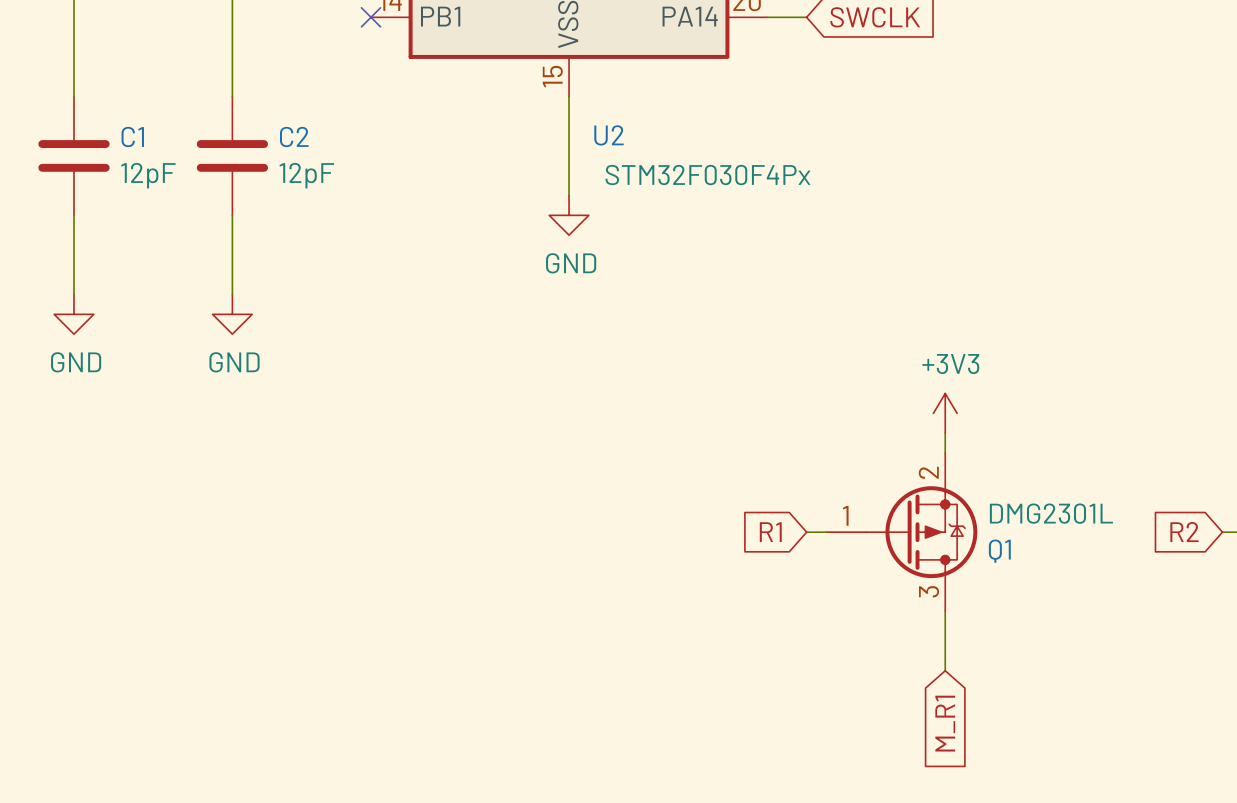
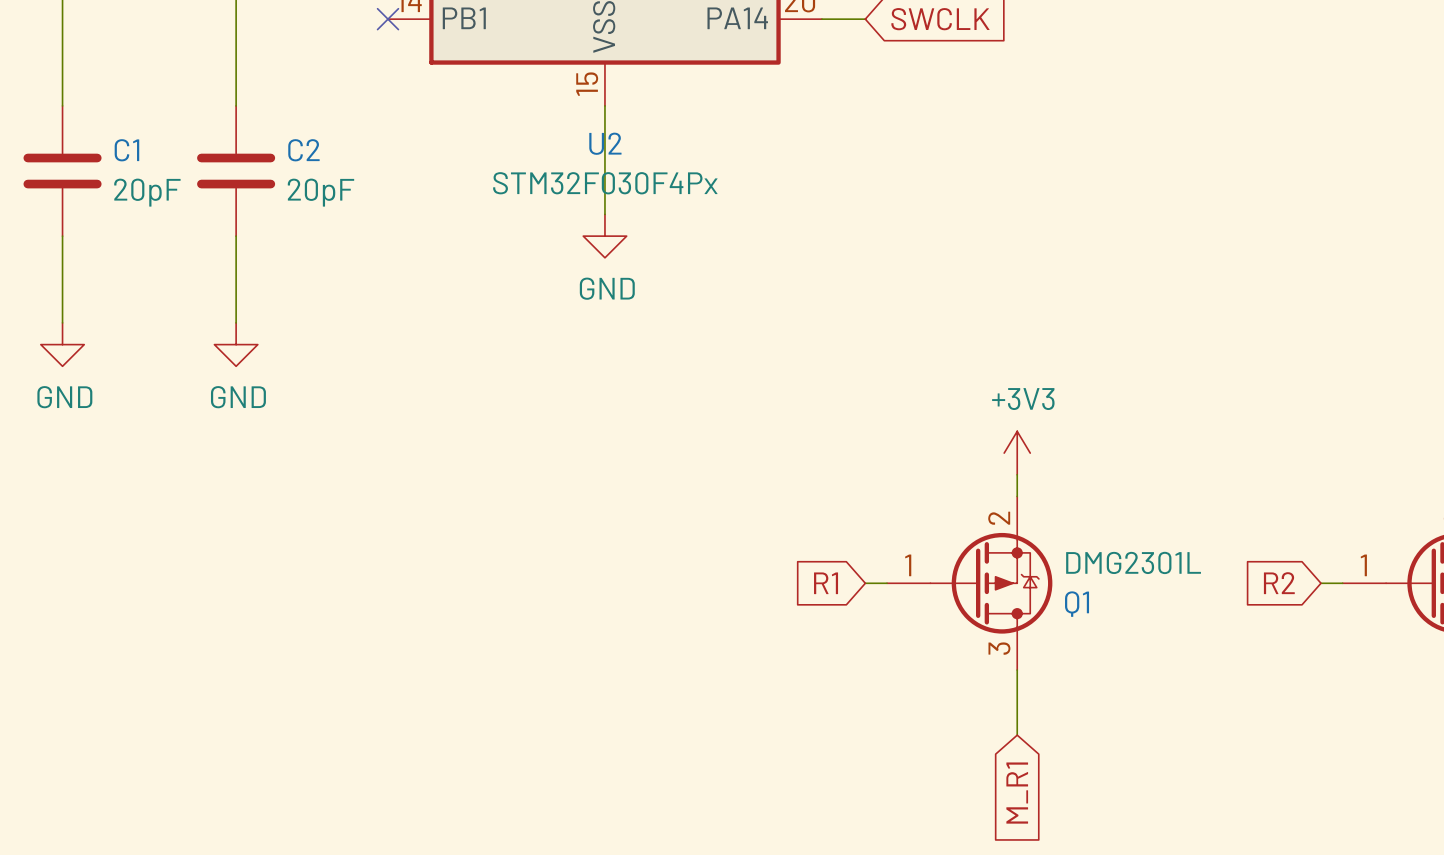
U2 name position: U2 (609, 135) -> U2 (605, 143)
C1 value: 12pF (148, 175) -> 20pF (147, 192)
C2 value: 12pF (306, 175) -> 20pF (320, 192)
U2 value position: STM32F030F4Px (707, 175) -> STM32F030F4Px (605, 183)

